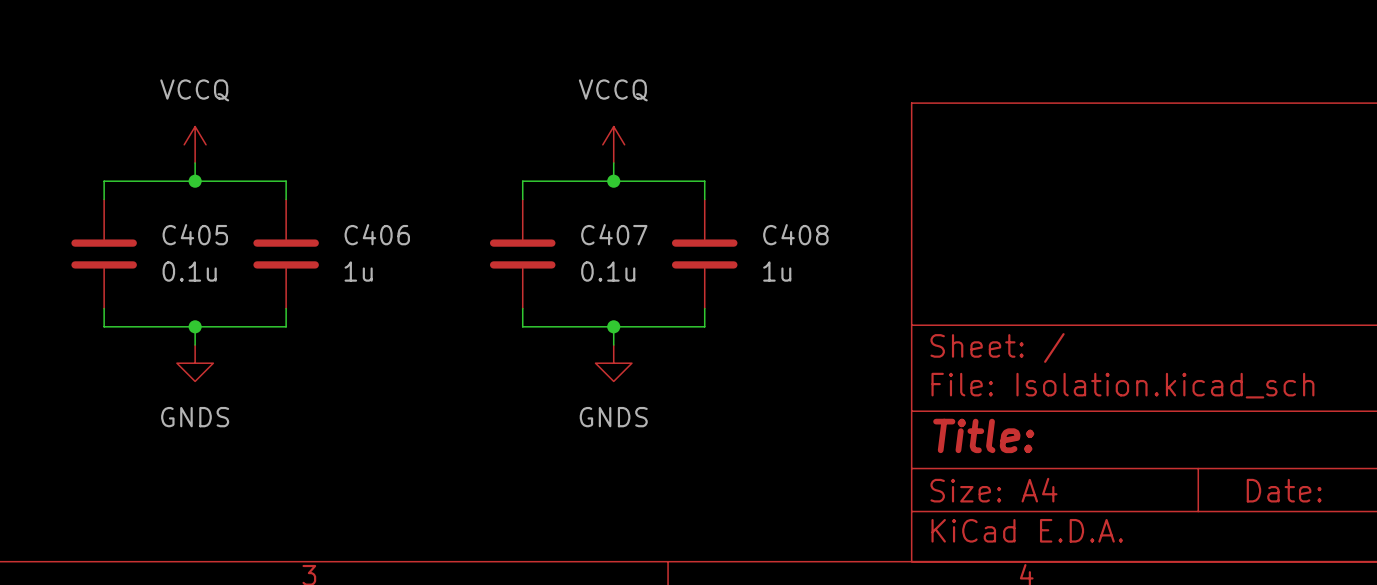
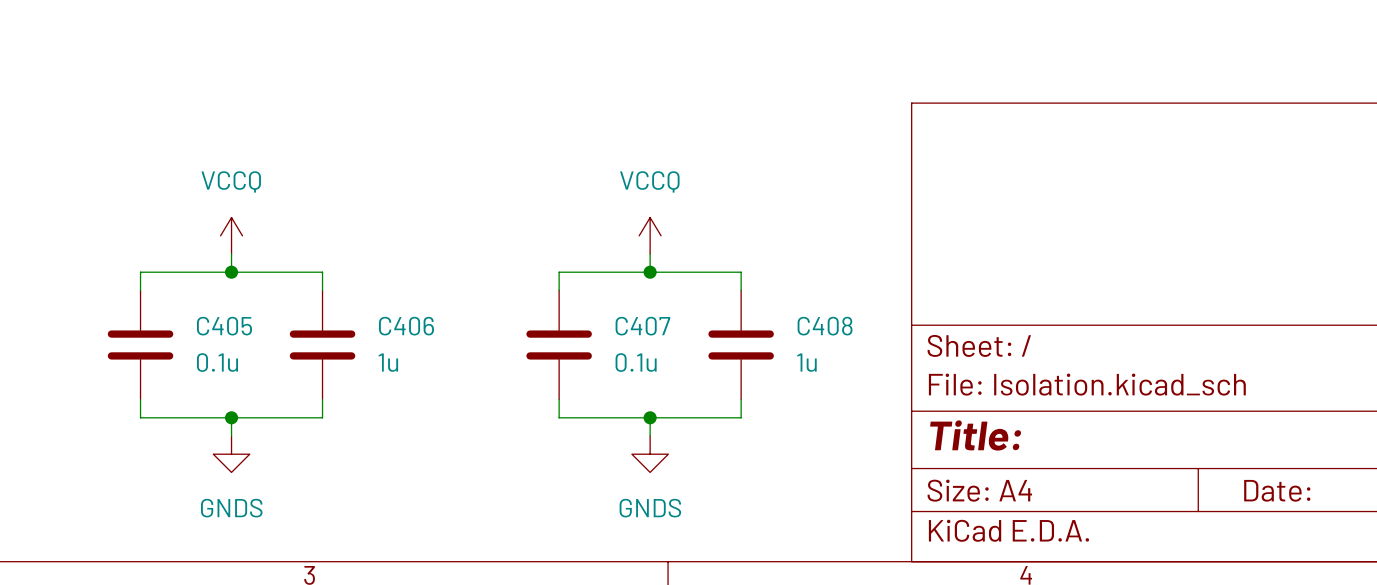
power symbol position: VCCQ (195, 144) -> VCCQ (231, 235)
power symbol position: VCCQ (613, 144) -> VCCQ (650, 235)
wire: (195, 163) (195, 181) -> (231, 254) (231, 272)
wire: (613, 163) (613, 181) -> (650, 254) (650, 272)
junction: (195, 181) -> none
junction: (613, 181) -> none
wire: (104, 199) (104, 181) (286, 181) (286, 199) -> (140, 290) (140, 272) (322, 272) (322, 290)
wire: (522, 199) (522, 181) (704, 181) (704, 199) -> (559, 290) (559, 272) (741, 272) (741, 290)
C405 position: (104, 254) -> (140, 345)
C406 position: (286, 254) -> (322, 345)
C407 position: (522, 254) -> (559, 345)
C408 position: (704, 254) -> (741, 345)
junction: none -> (231, 272)
junction: none -> (650, 272)
wire: (104, 308) (104, 326) (286, 326) (286, 308) -> (140, 399) (140, 417) (322, 417) (322, 399)
wire: (522, 308) (522, 326) (704, 326) (704, 308) -> (559, 399) (559, 417) (741, 417) (741, 399)
wire: (195, 326) (195, 345) -> (231, 417) (231, 436)
junction: (195, 326) -> none
wire: (613, 326) (613, 345) -> (650, 417) (650, 436)
junction: (613, 326) -> none
power symbol position: GNDS (195, 363) -> GNDS (231, 454)
power symbol position: GNDS (613, 363) -> GNDS (650, 454)
junction: none -> (231, 417)
junction: none -> (650, 417)

